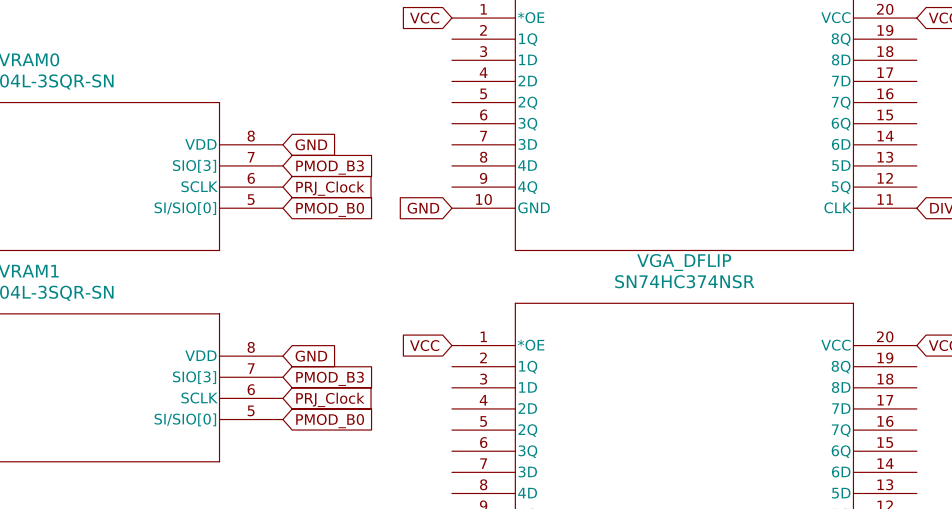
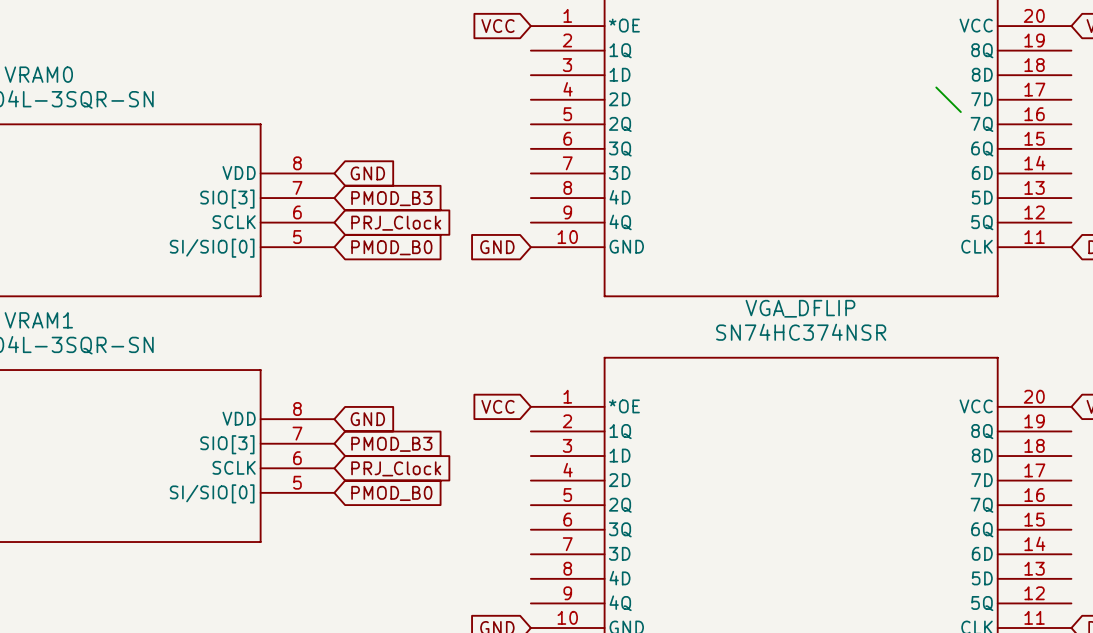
wire: none -> (936, 87) (960, 112)

